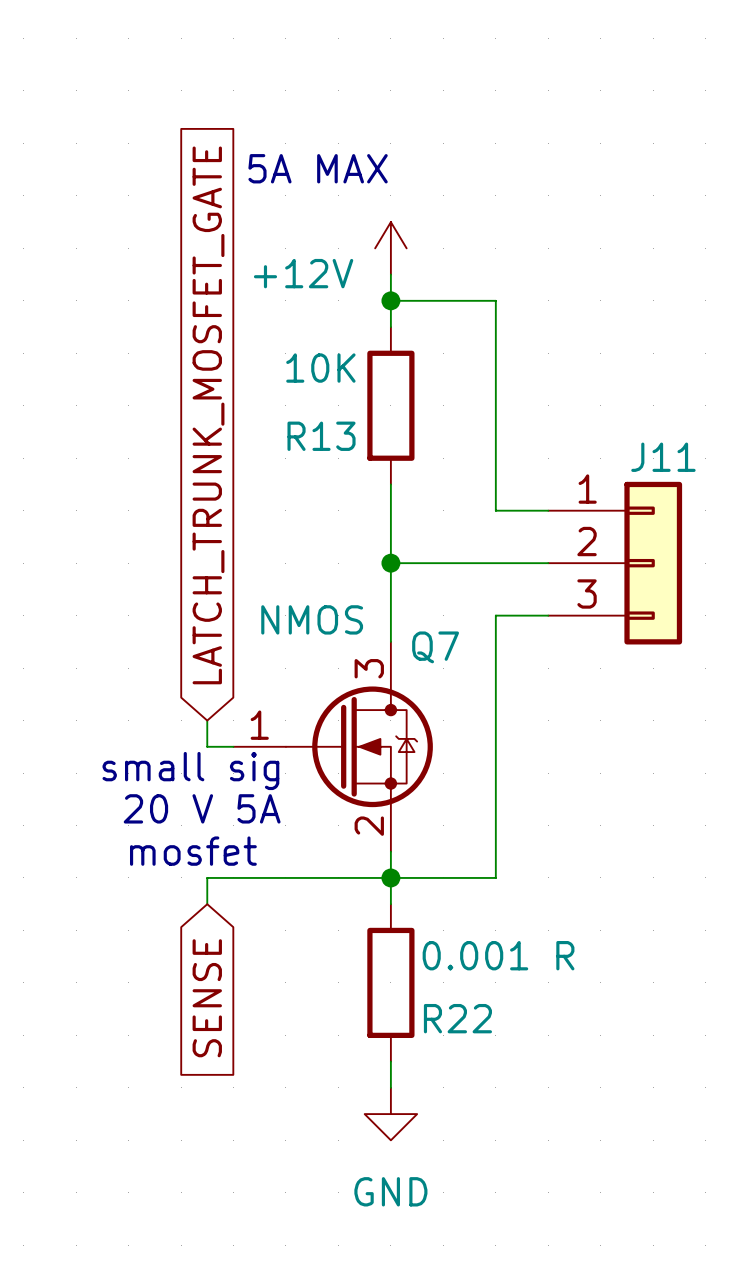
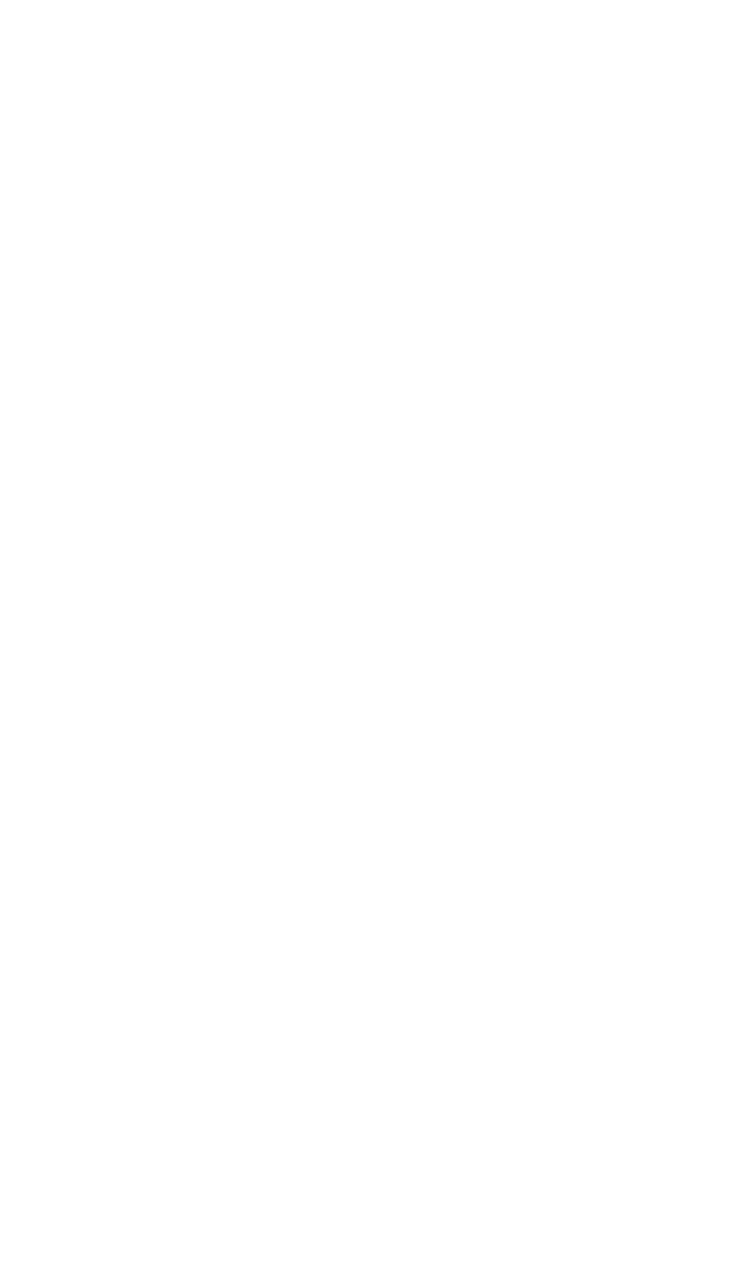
text: 5A MAX (318, 168) -> none
power symbol: +12V (390, 248) -> none
wire: (390, 274) (390, 327) -> none
wire: (390, 300) (495, 300) (495, 510) (548, 510) -> none
junction: (390, 300) -> none
R13: 10K (390, 405) -> none
global label: LATCH_TRUNK_MOSFET_GATE (208, 415) -> none
wire: (390, 484) (390, 641) -> none
wire: (390, 563) (548, 563) -> none
junction: (390, 563) -> none
J11: (615, 563) -> none
wire: (548, 615) (495, 615) (495, 877) (207, 877) (207, 904) -> none
wire: (207, 720) (207, 746) (233, 746) -> none
Q7: NMOS (333, 746) -> none
text: small sig (190, 771) -> none
text: 20 V 5A (202, 808) -> none
text: mosfet (193, 851) -> none
wire: (390, 851) (390, 904) -> none
junction: (390, 877) -> none
R22: 0.001 R (390, 982) -> none
global label: SENSE (207, 998) -> none
wire: (390, 1061) (390, 1087) -> none
power symbol: GND (390, 1114) -> none

